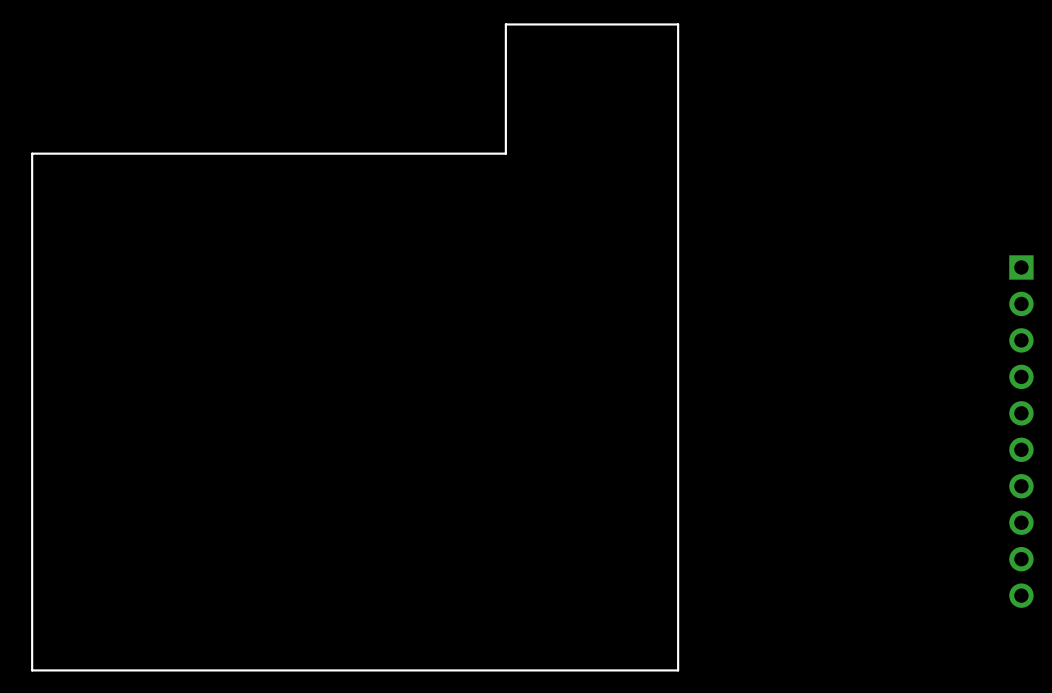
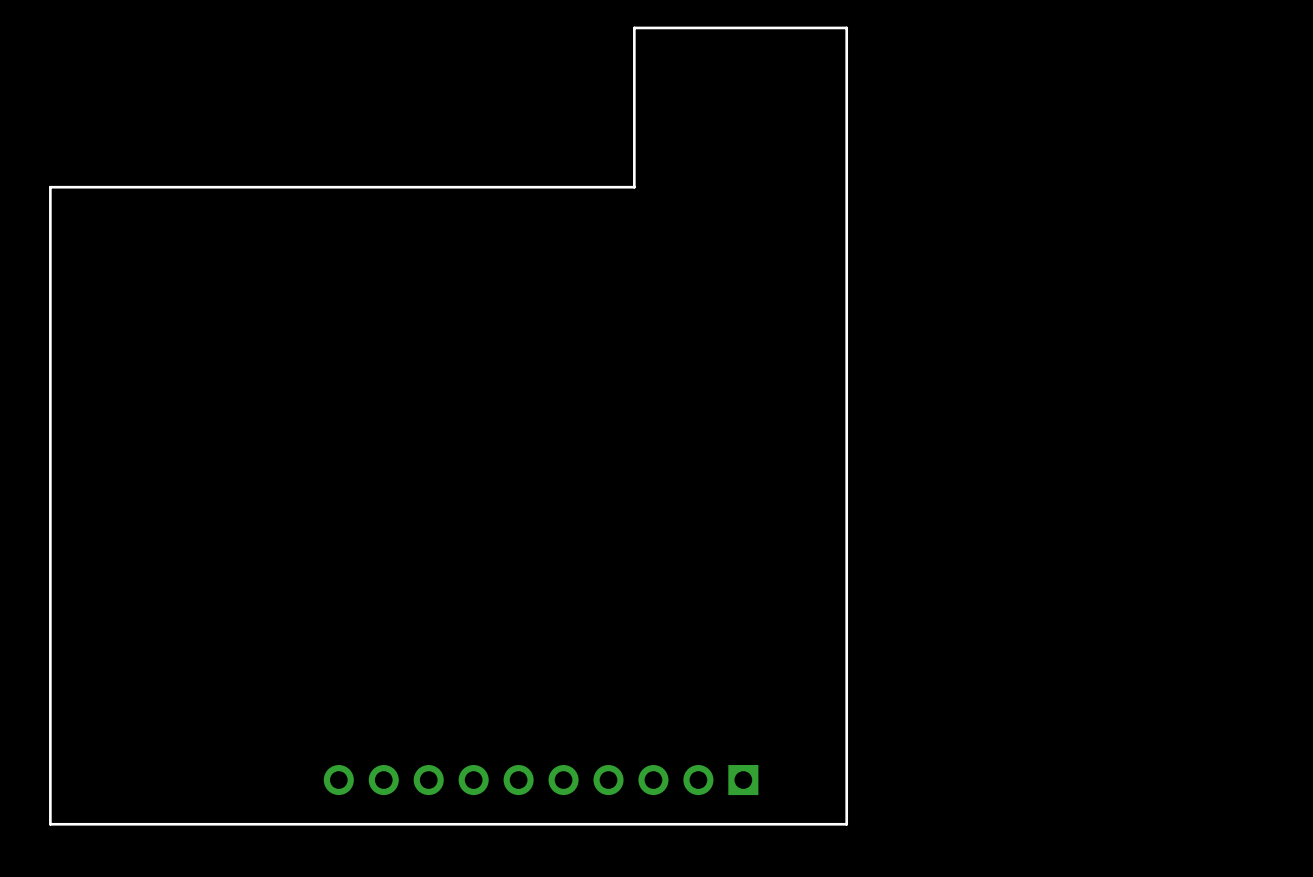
part: (1021, 431) -> none
part: none -> (541, 780)

